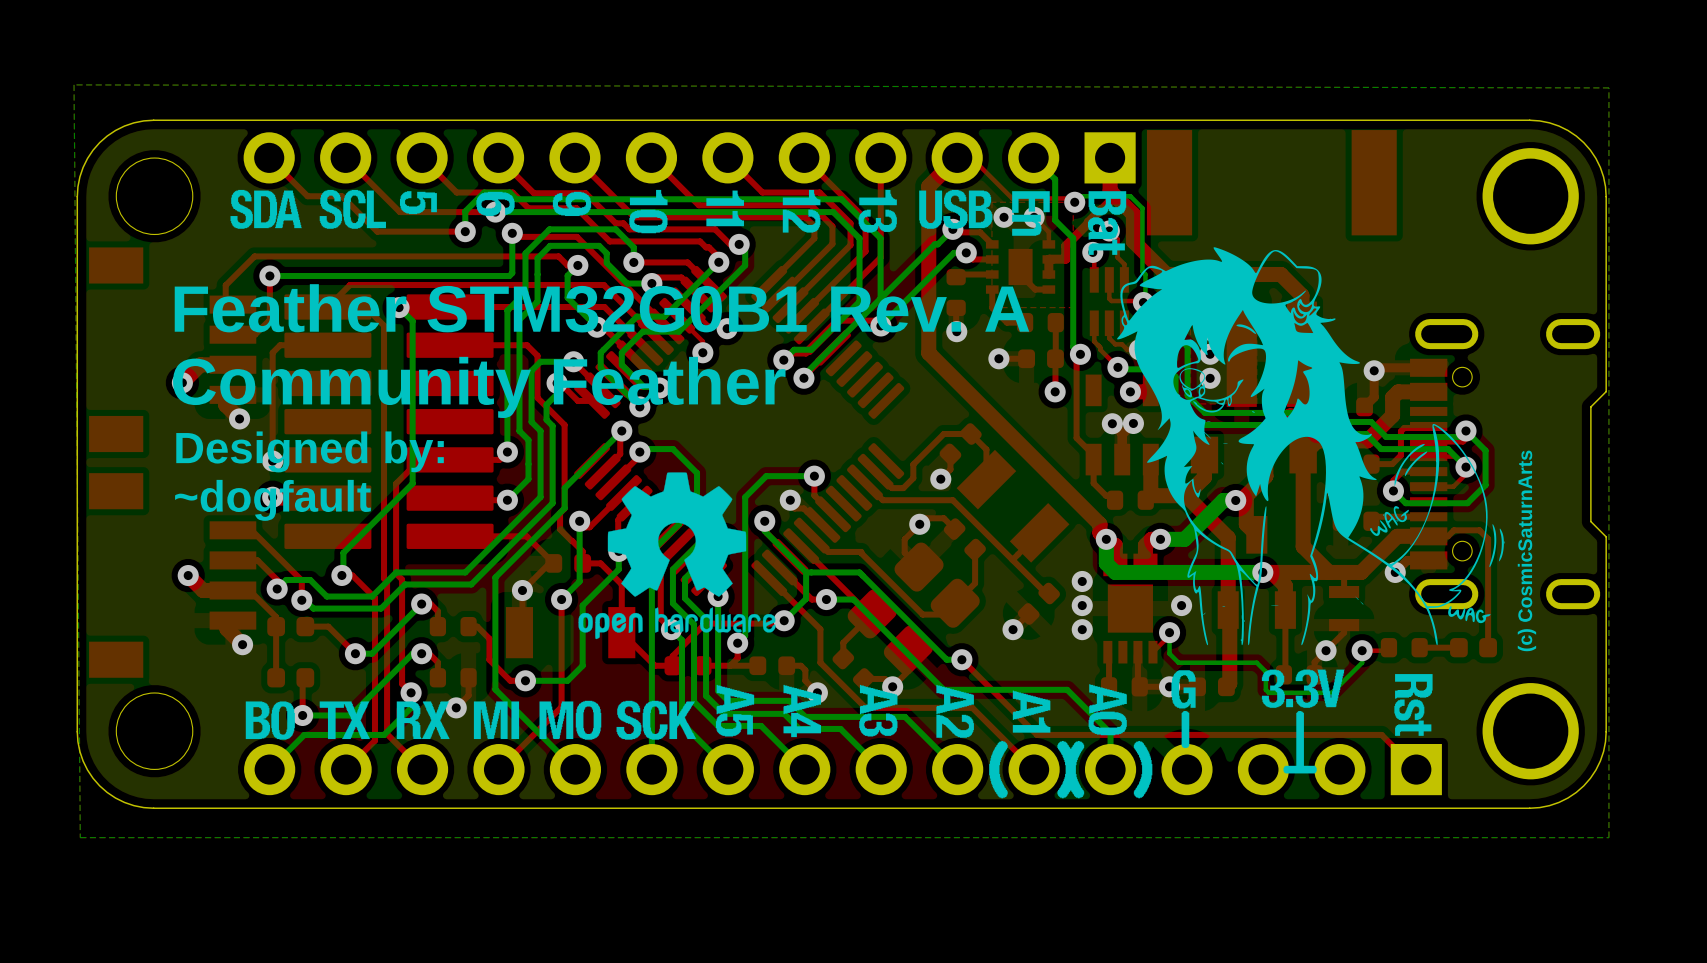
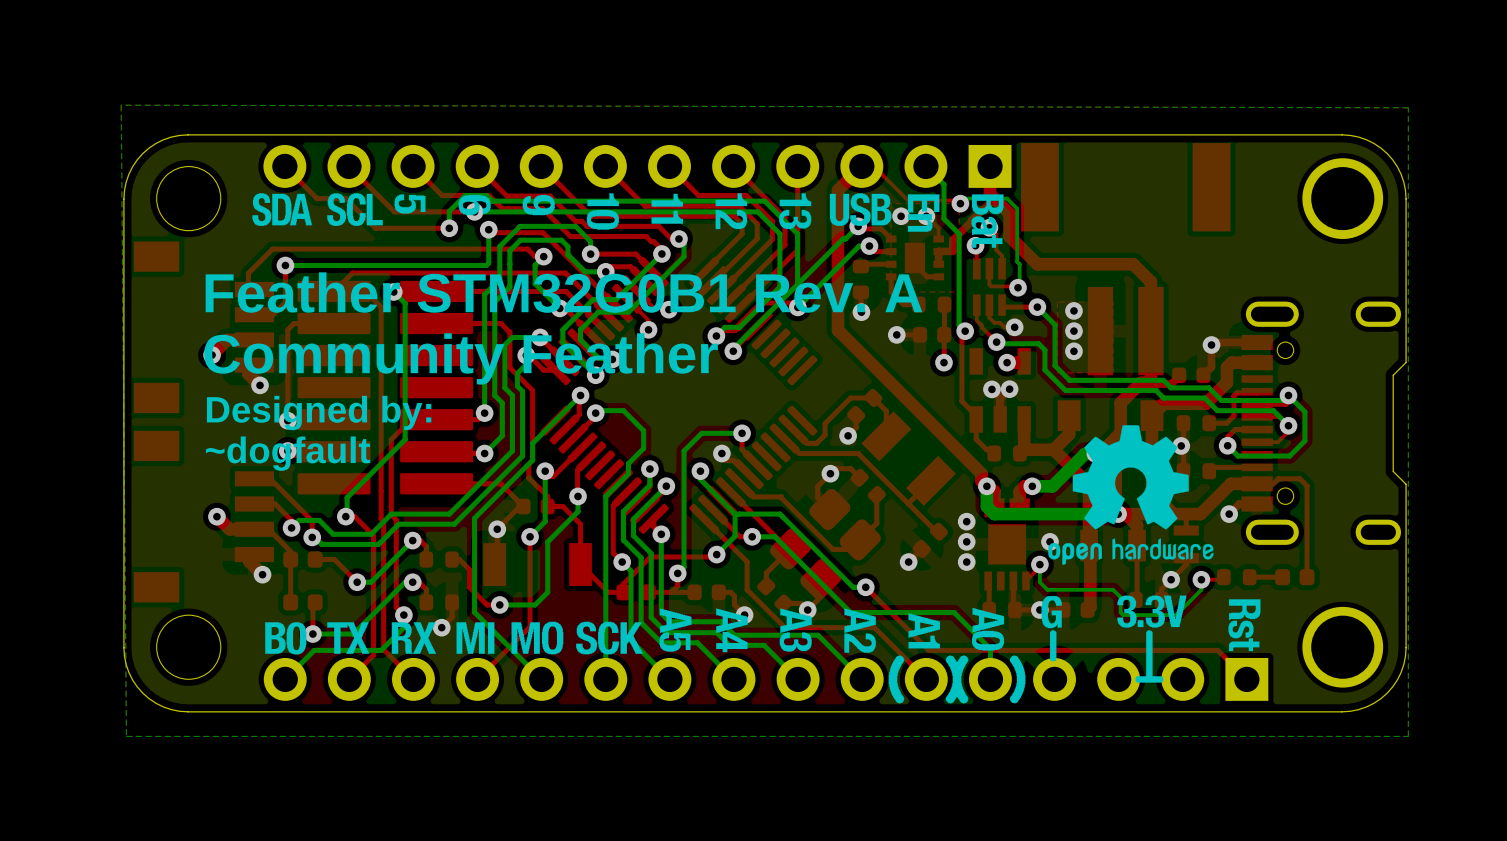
drawing: [1117, 247, 1506, 646] -> none
text: (c) CosmicSaturnArts (1526, 550) -> none
drawing position: (676, 555) -> (1130, 495)

